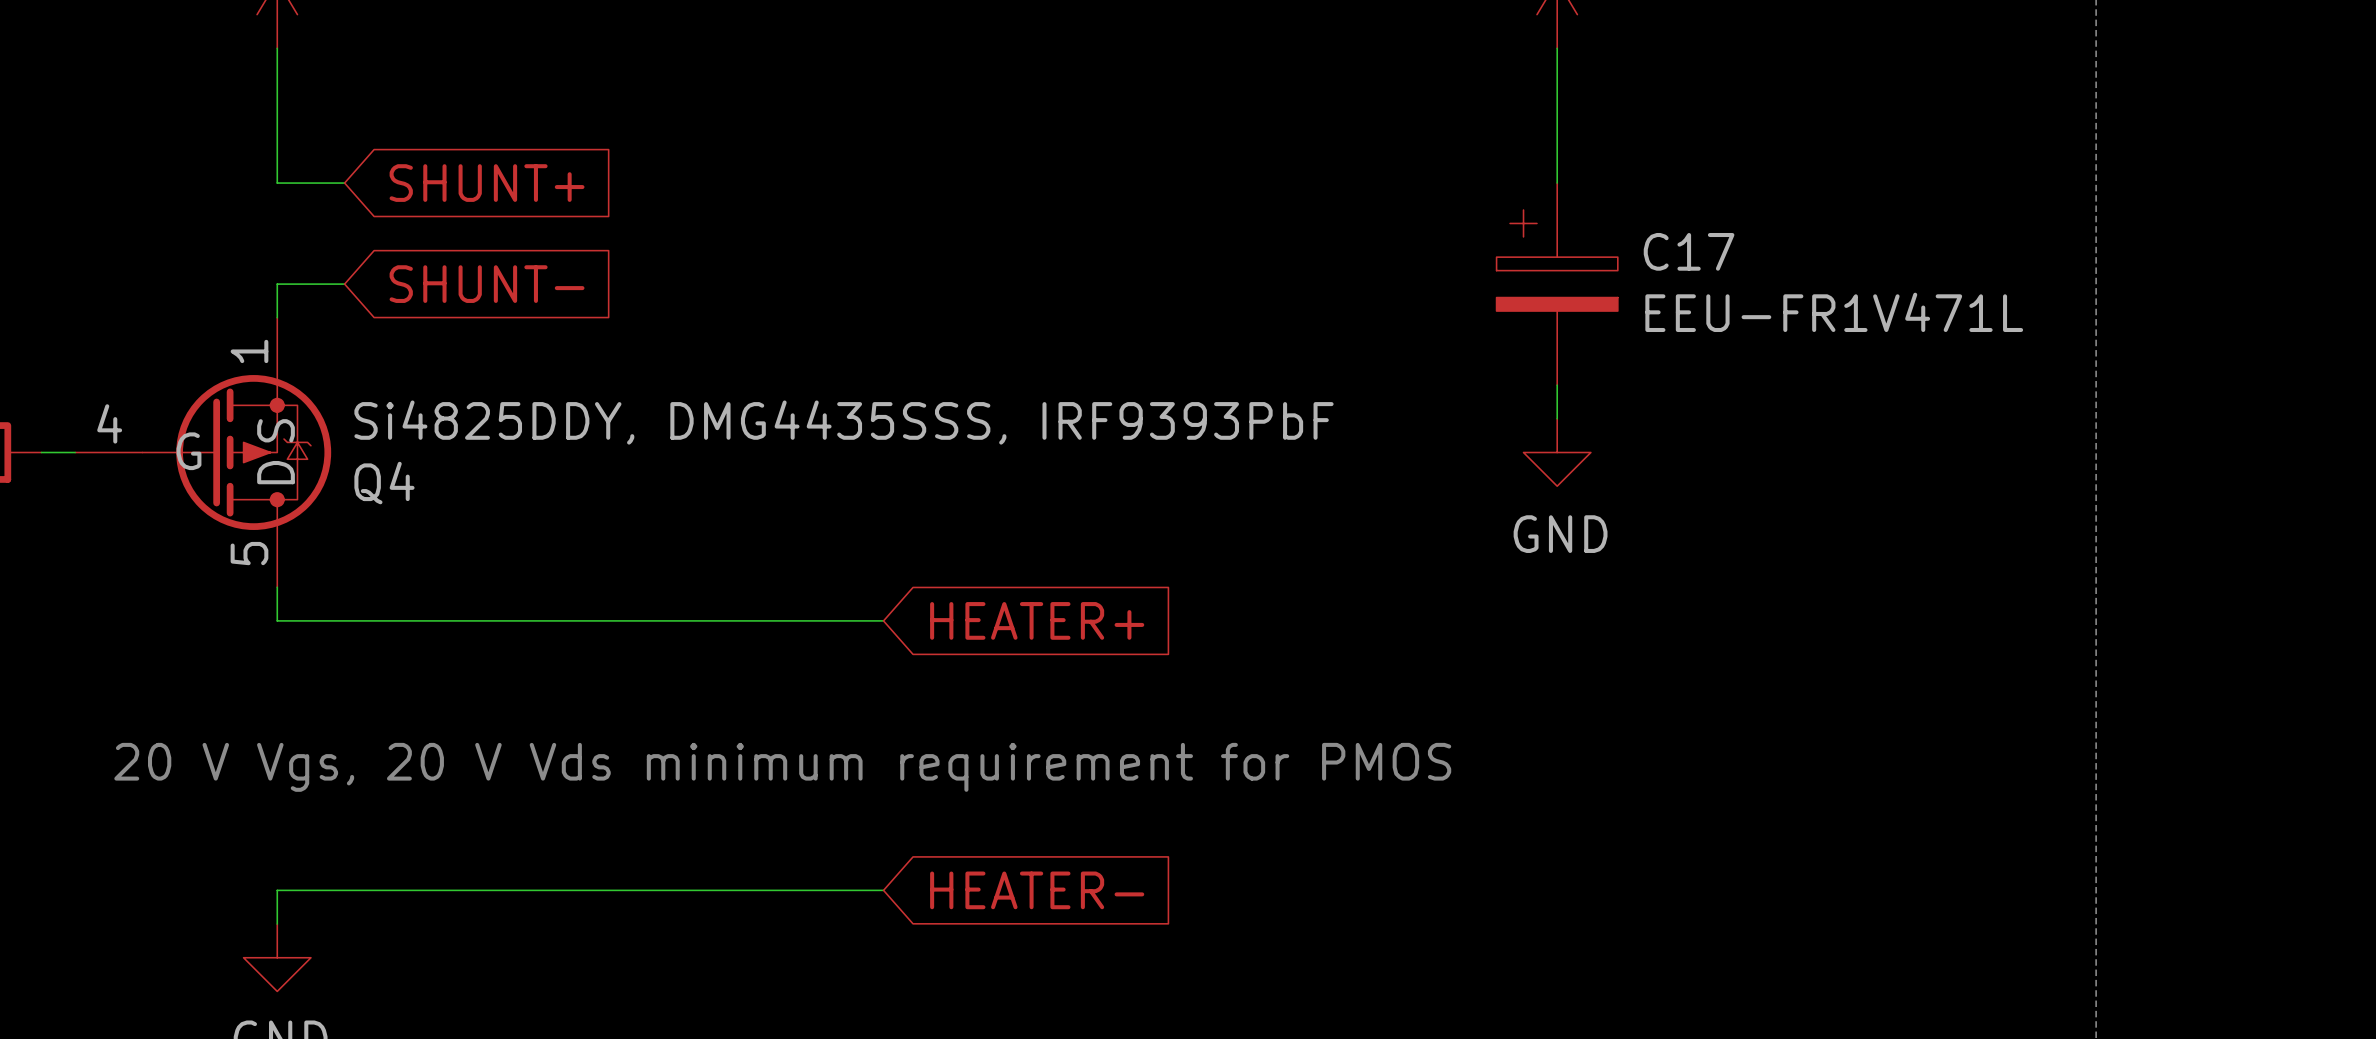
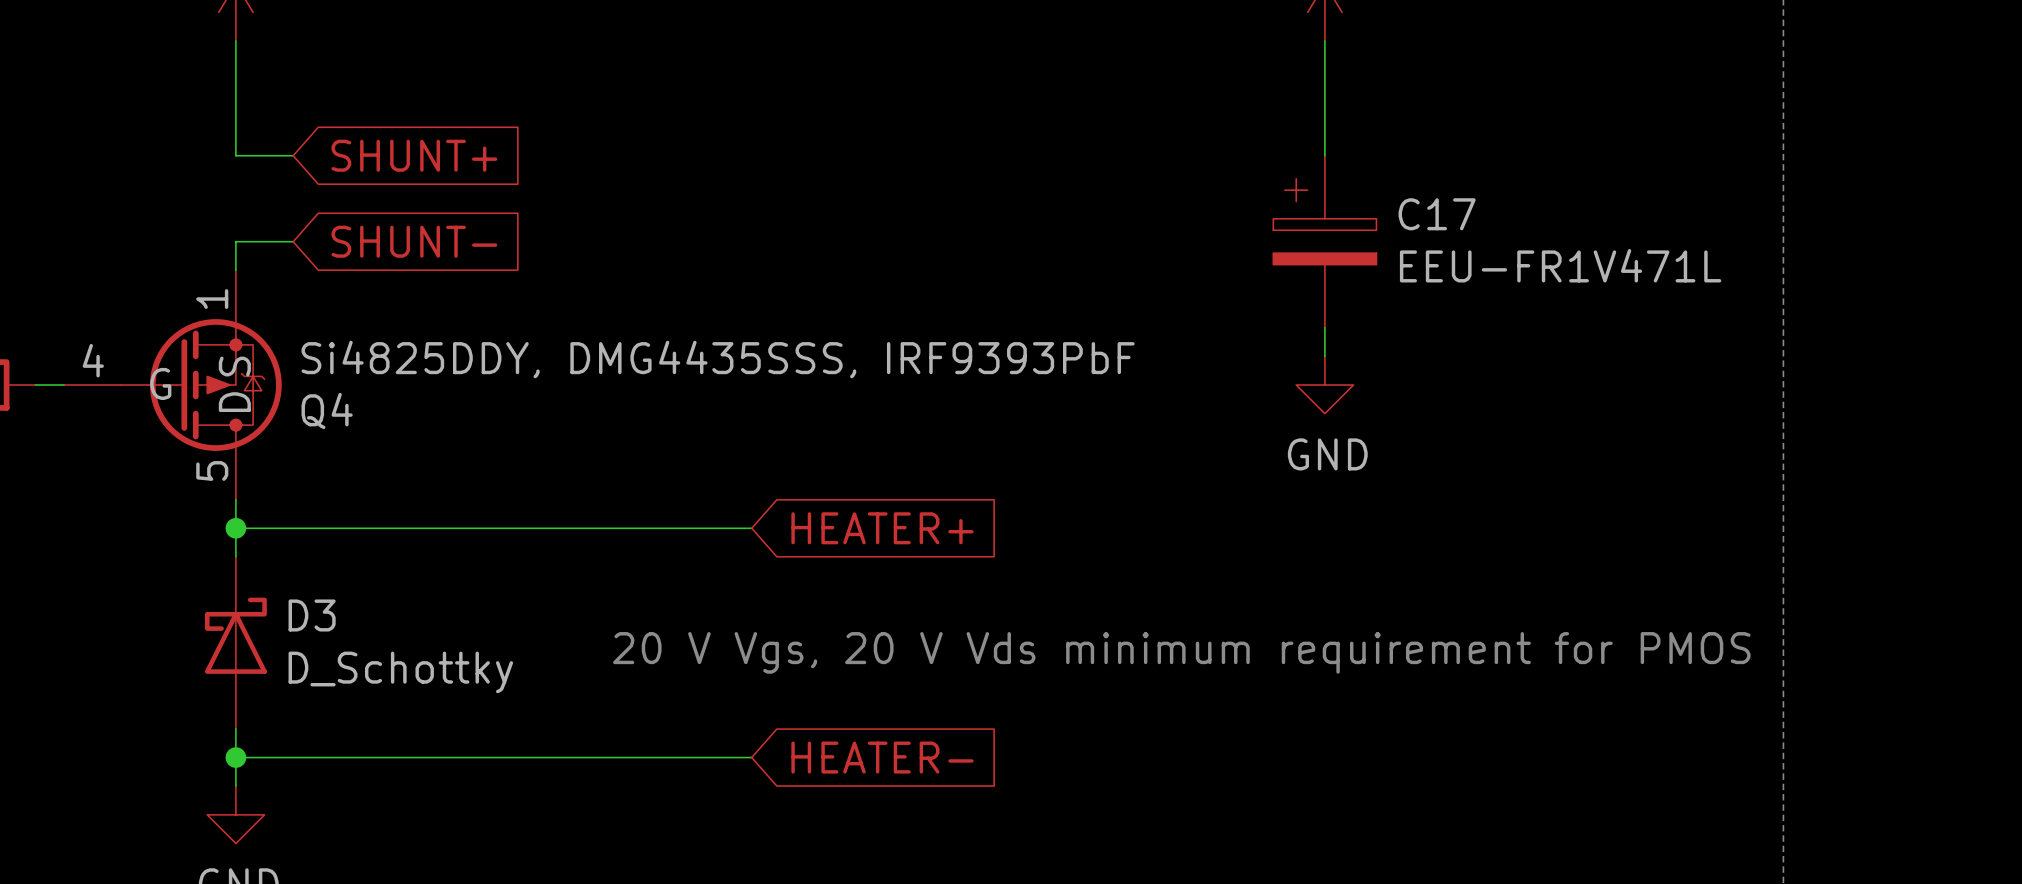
wire: none -> (235, 528) (235, 556)
junction: none -> (235, 528)
D3: none -> D_Schottky (235, 642)
text position: 20 V Vgs, 20 V Vds minimum requirement for PMOS (782, 767) -> 20 V Vgs, 20 V Vds minimum requirement for PMOS (1181, 652)
wire: none -> (235, 728) (235, 757)
junction: none -> (235, 757)

